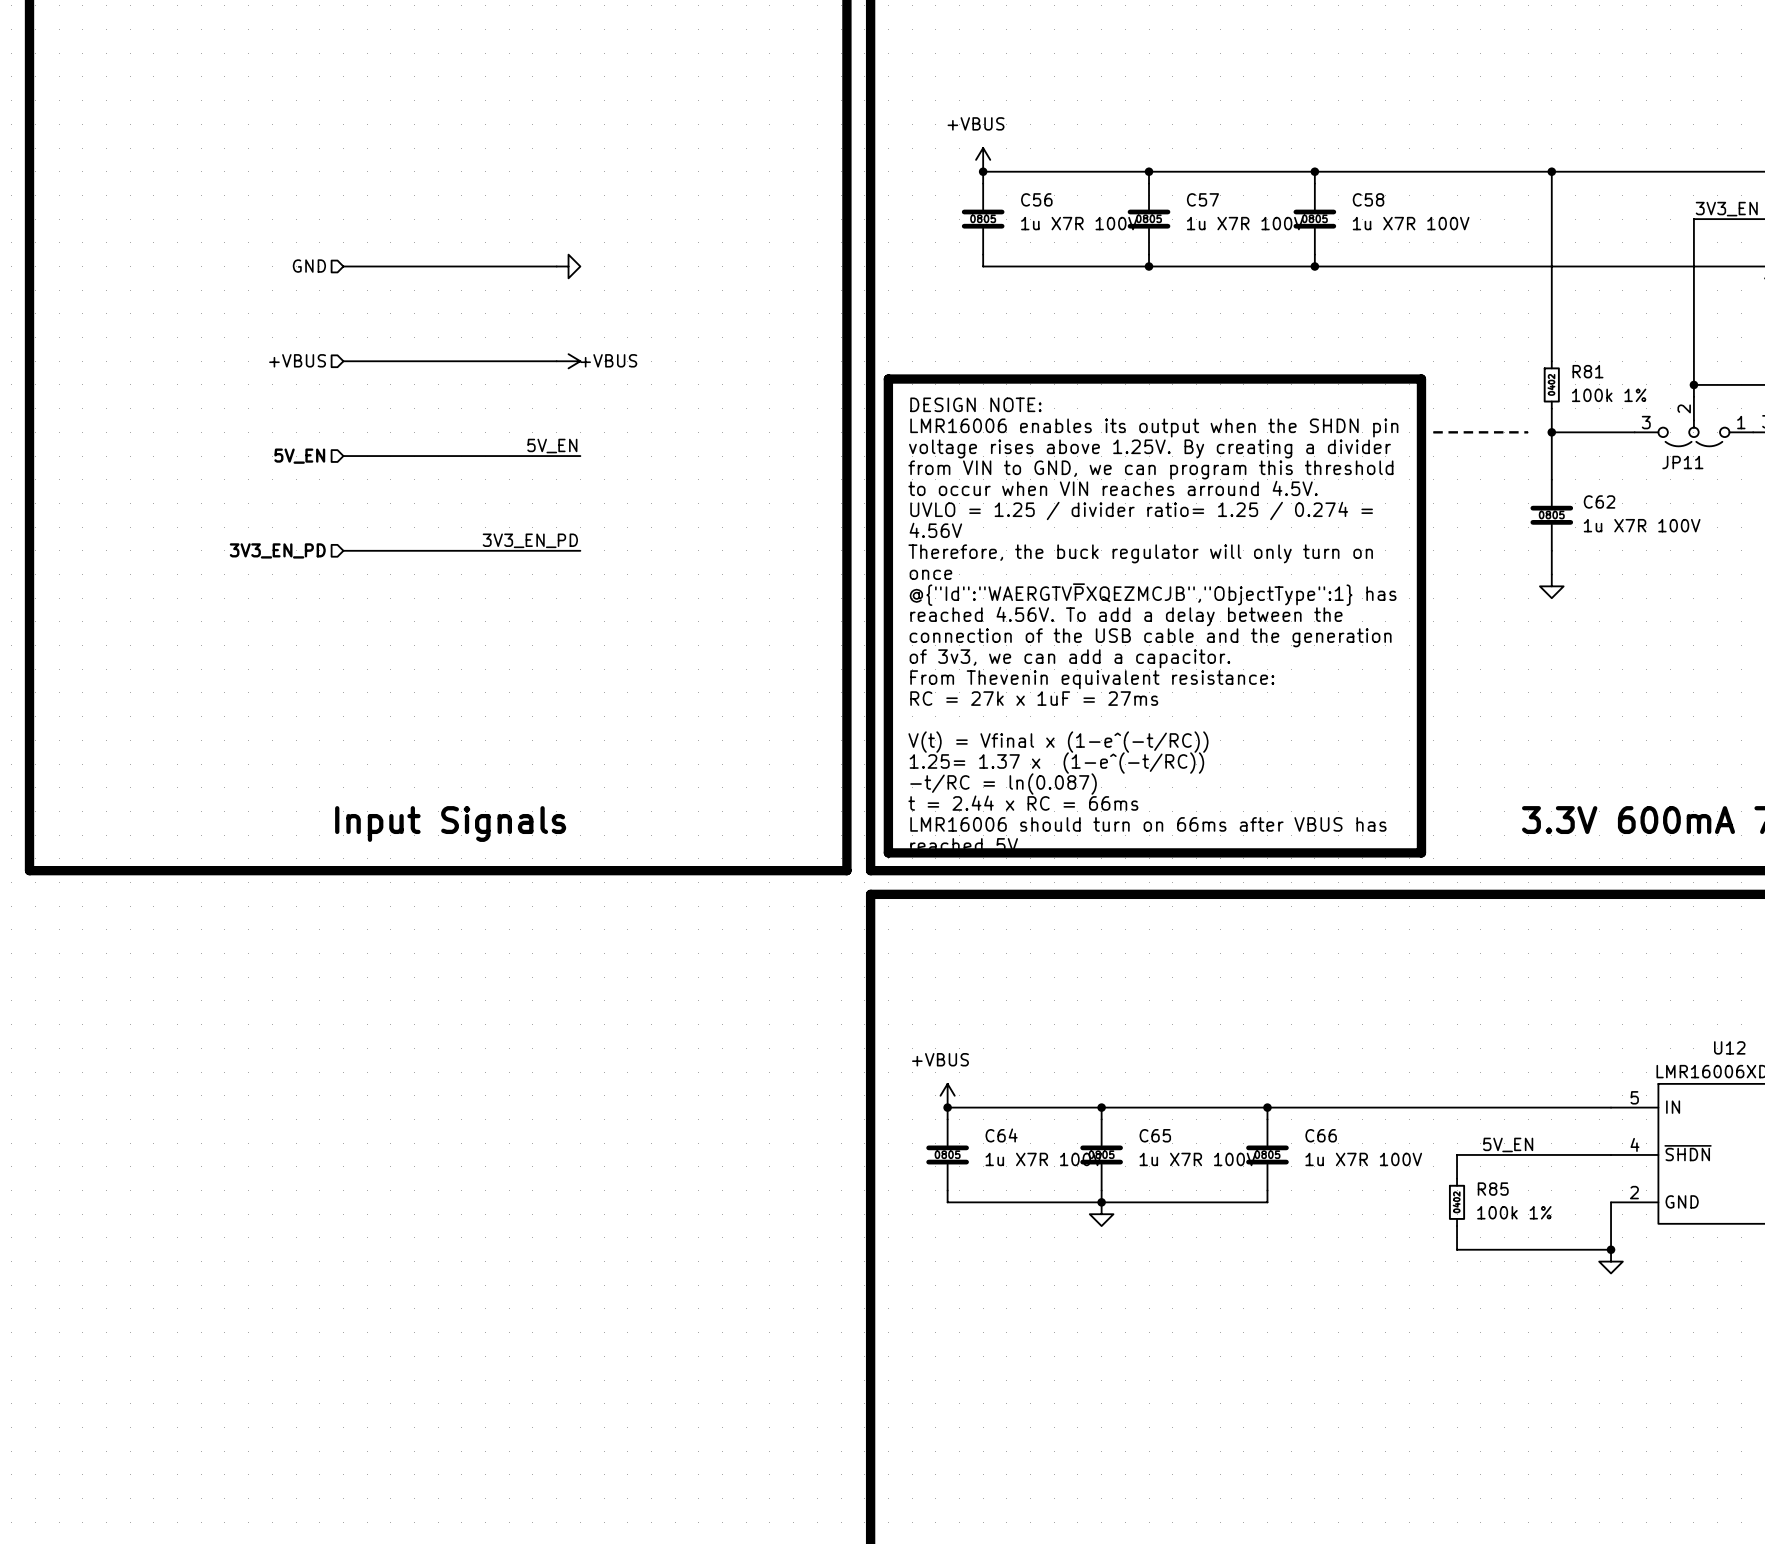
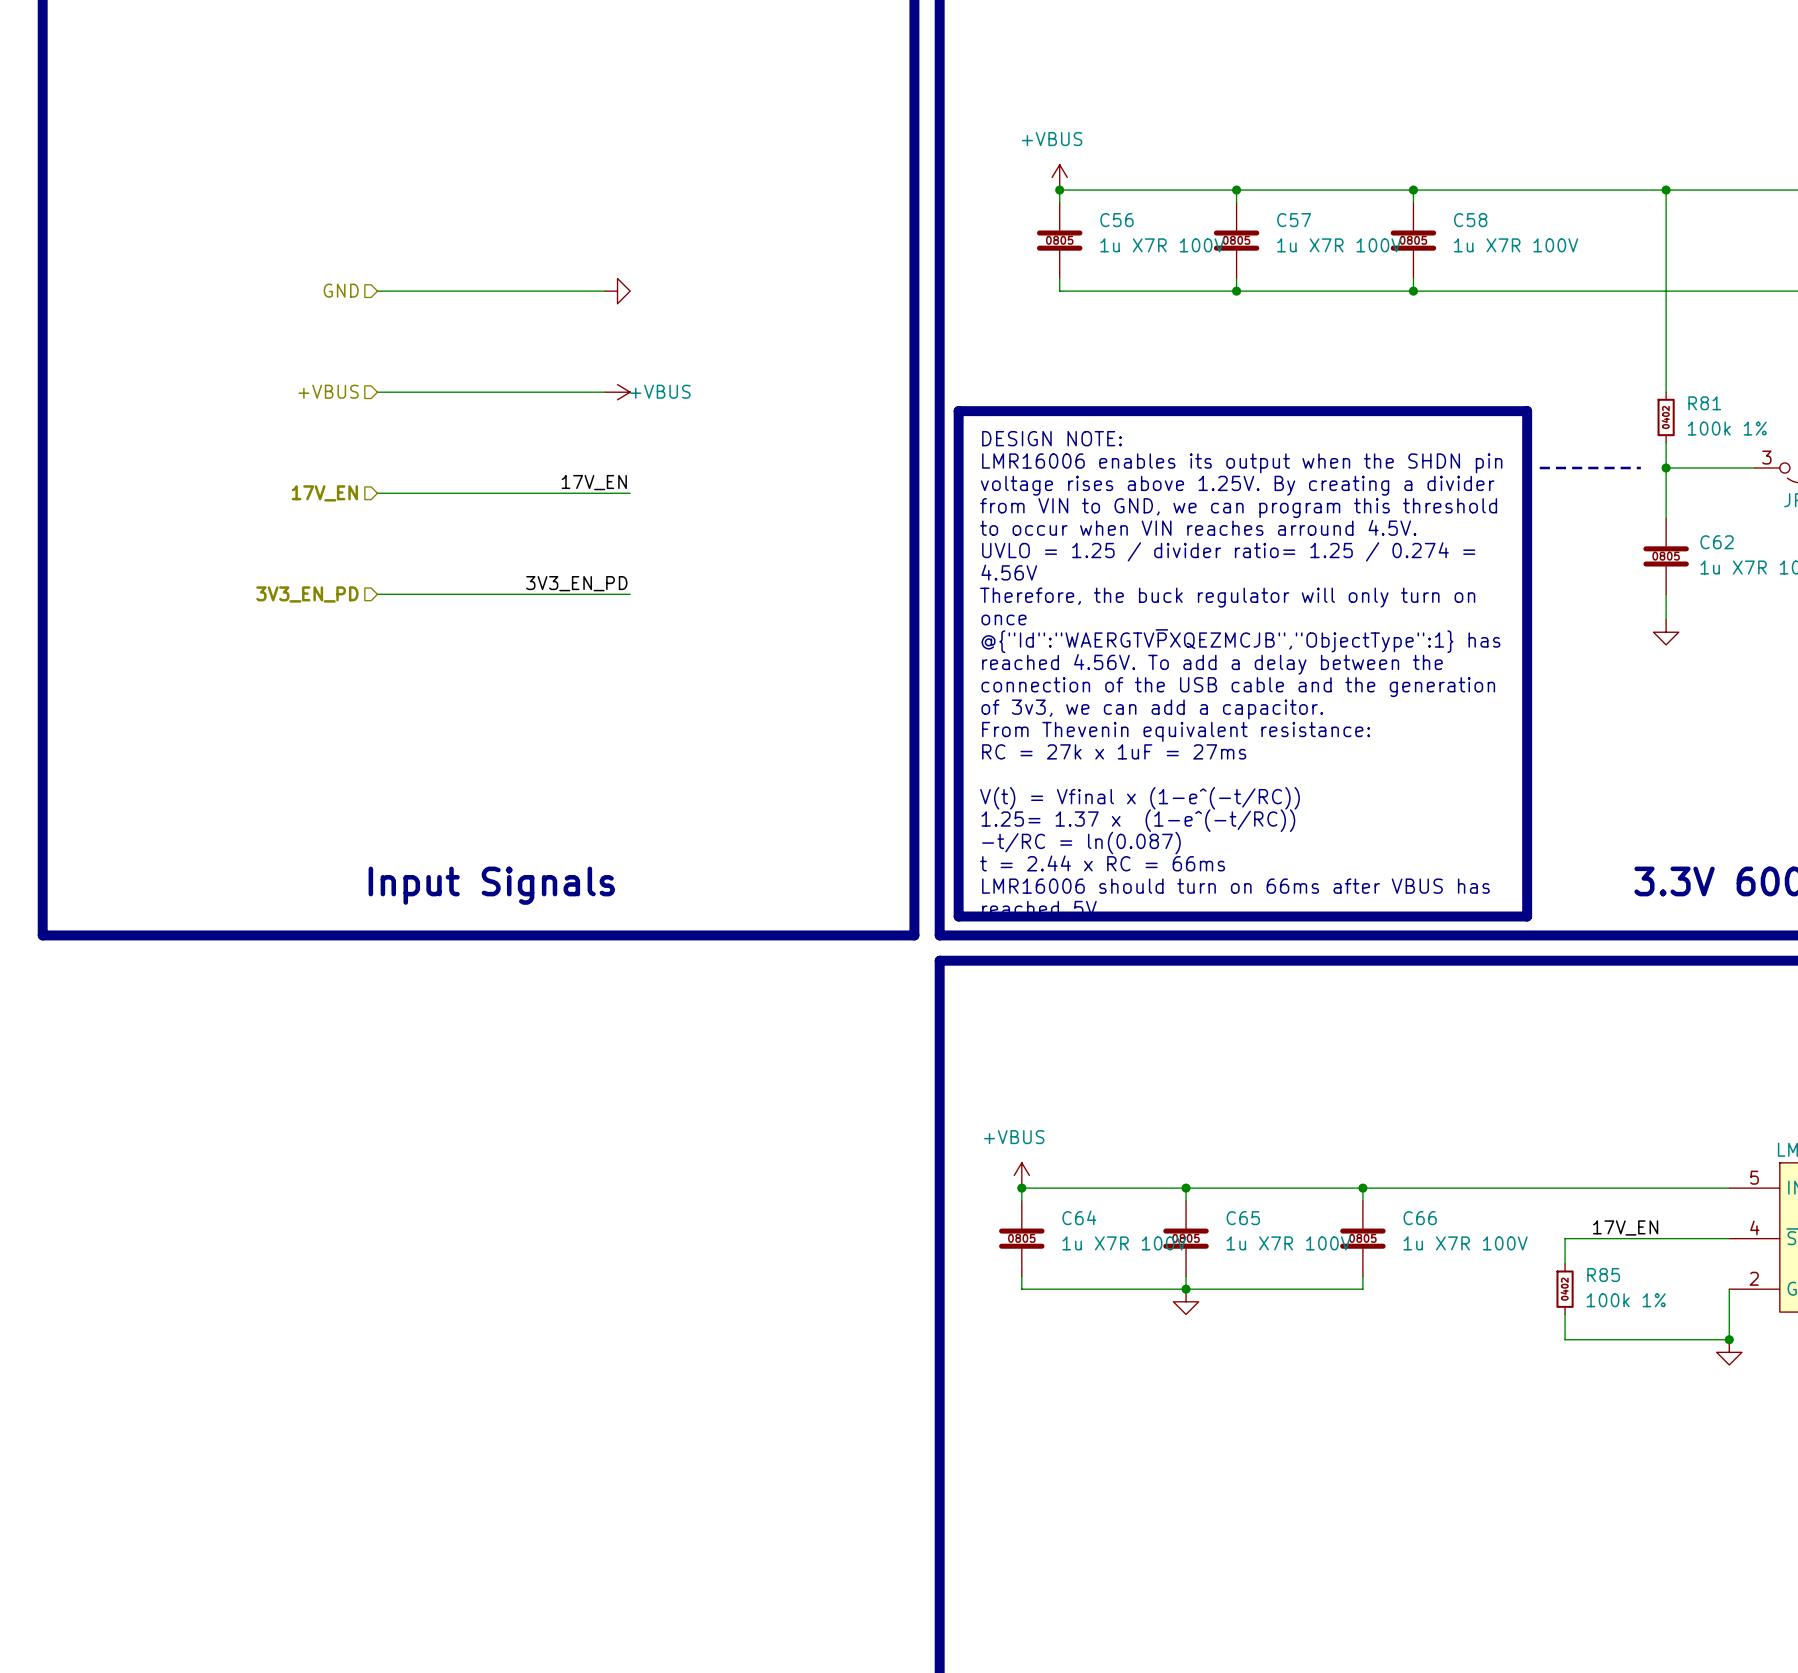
label: 5V_EN (552, 446) -> 17V_EN (594, 482)
hierarchical label: 5V_EN (299, 456) -> 17V_EN (324, 493)
label: 5V_EN (1508, 1144) -> 17V_EN (1625, 1227)

